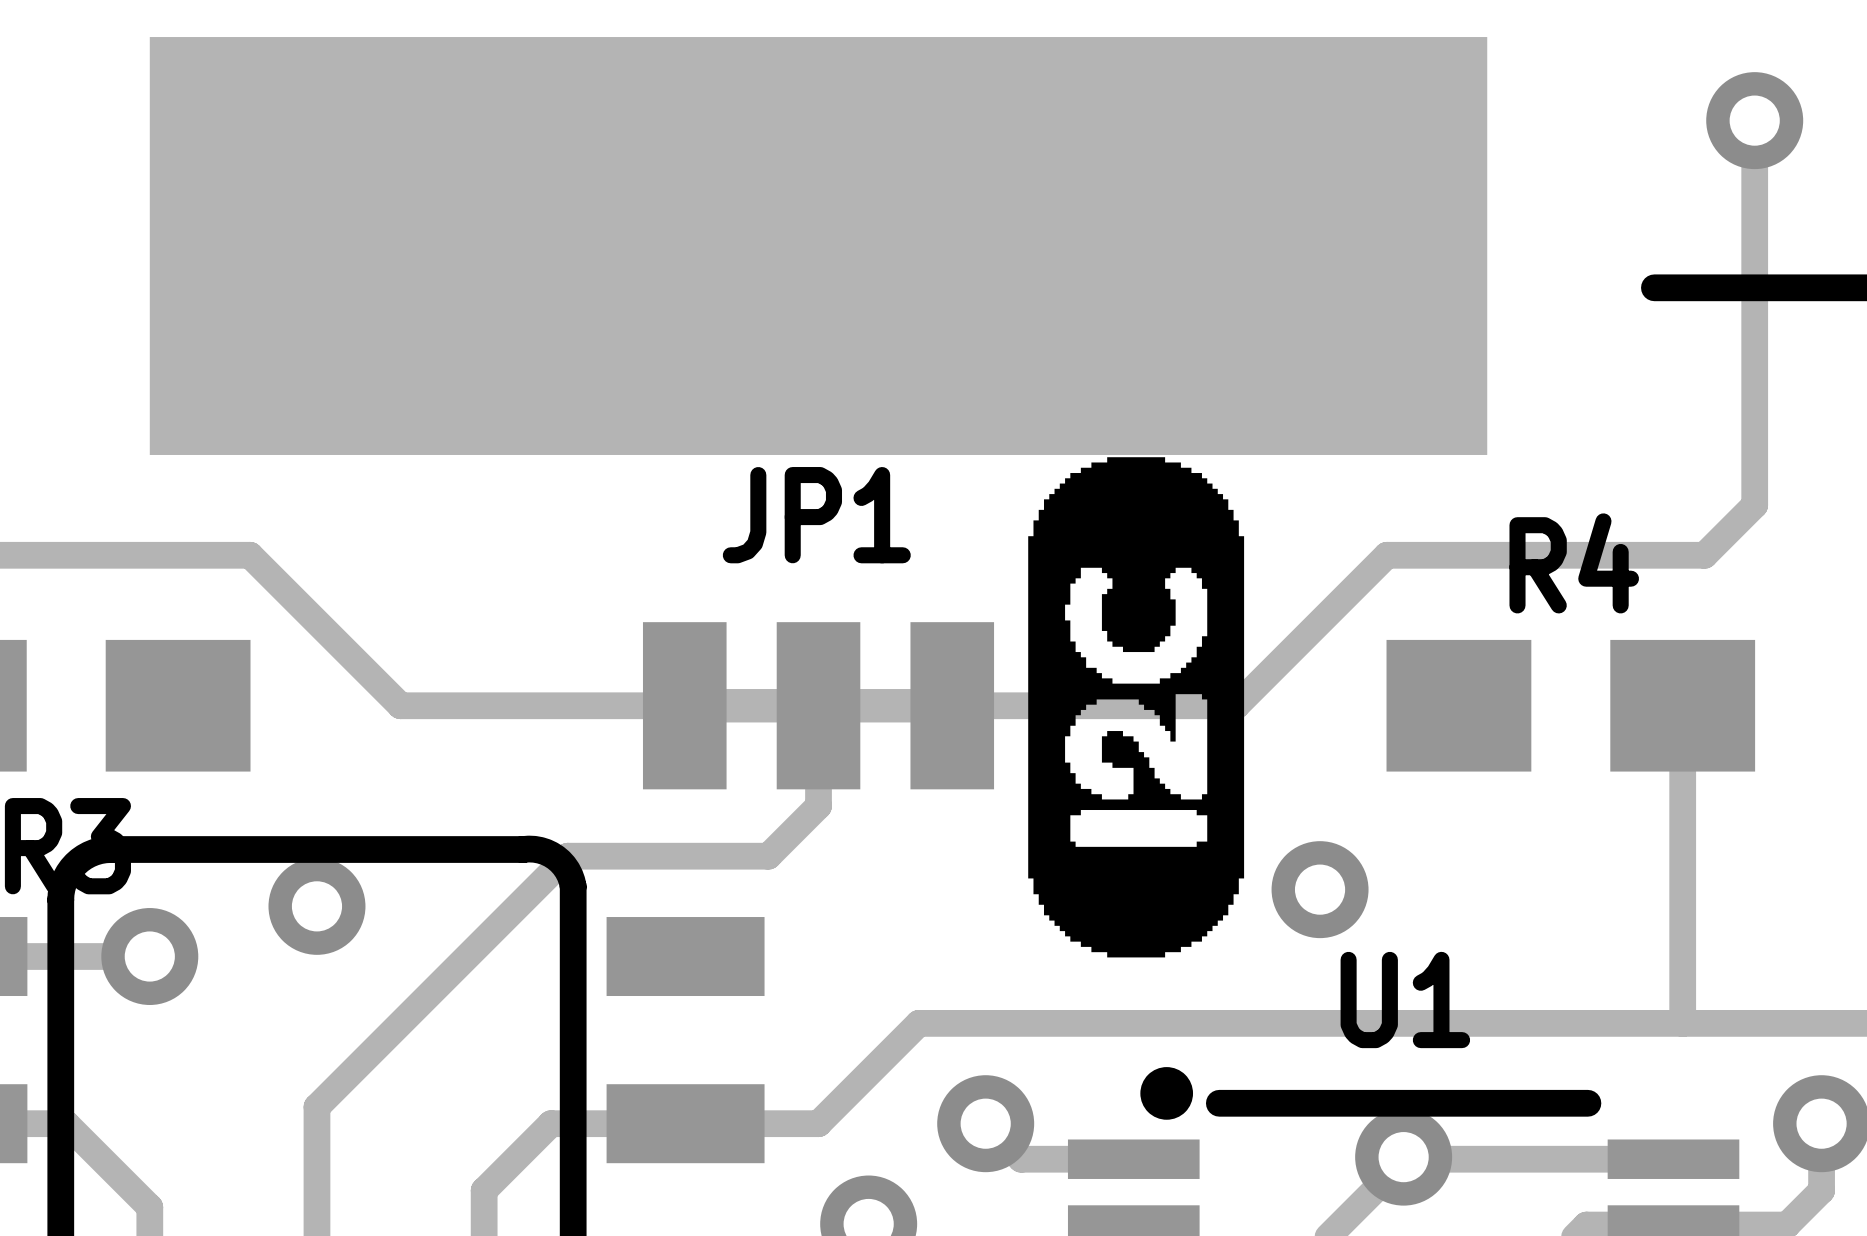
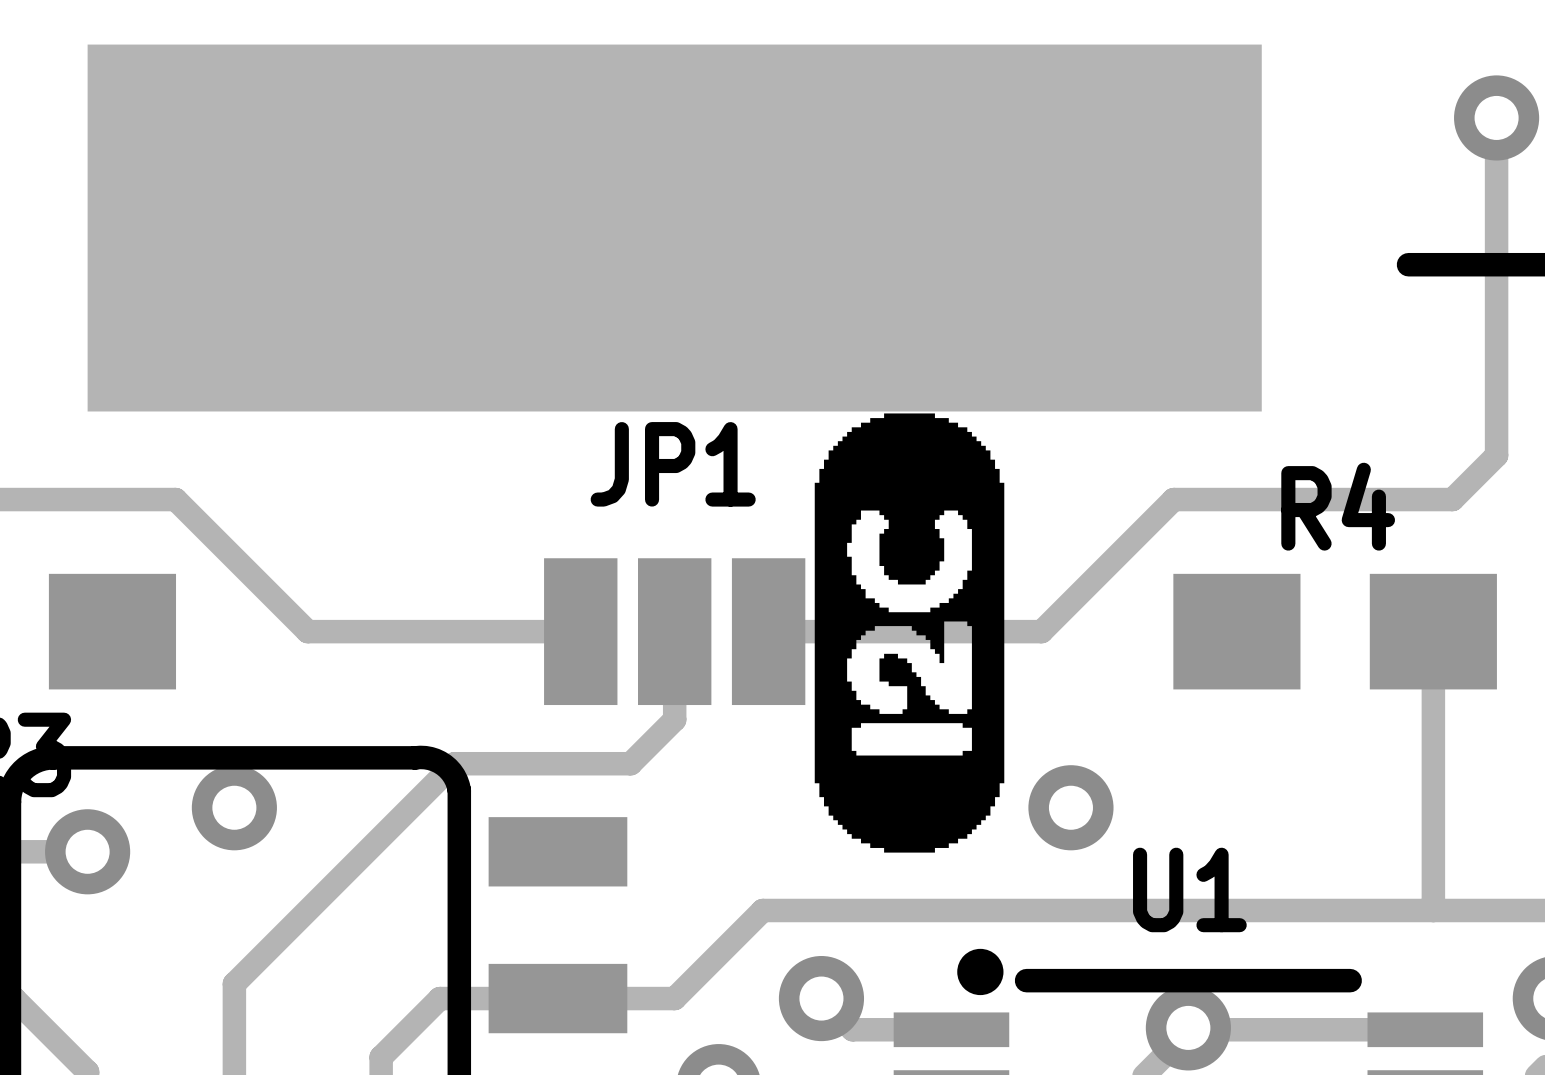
JP1 footprint: [642, 622, 995, 790] -> [544, 558, 806, 706]
drawing position: (1136, 707) -> (909, 633)
via position: (1320, 889) -> (1070, 807)

